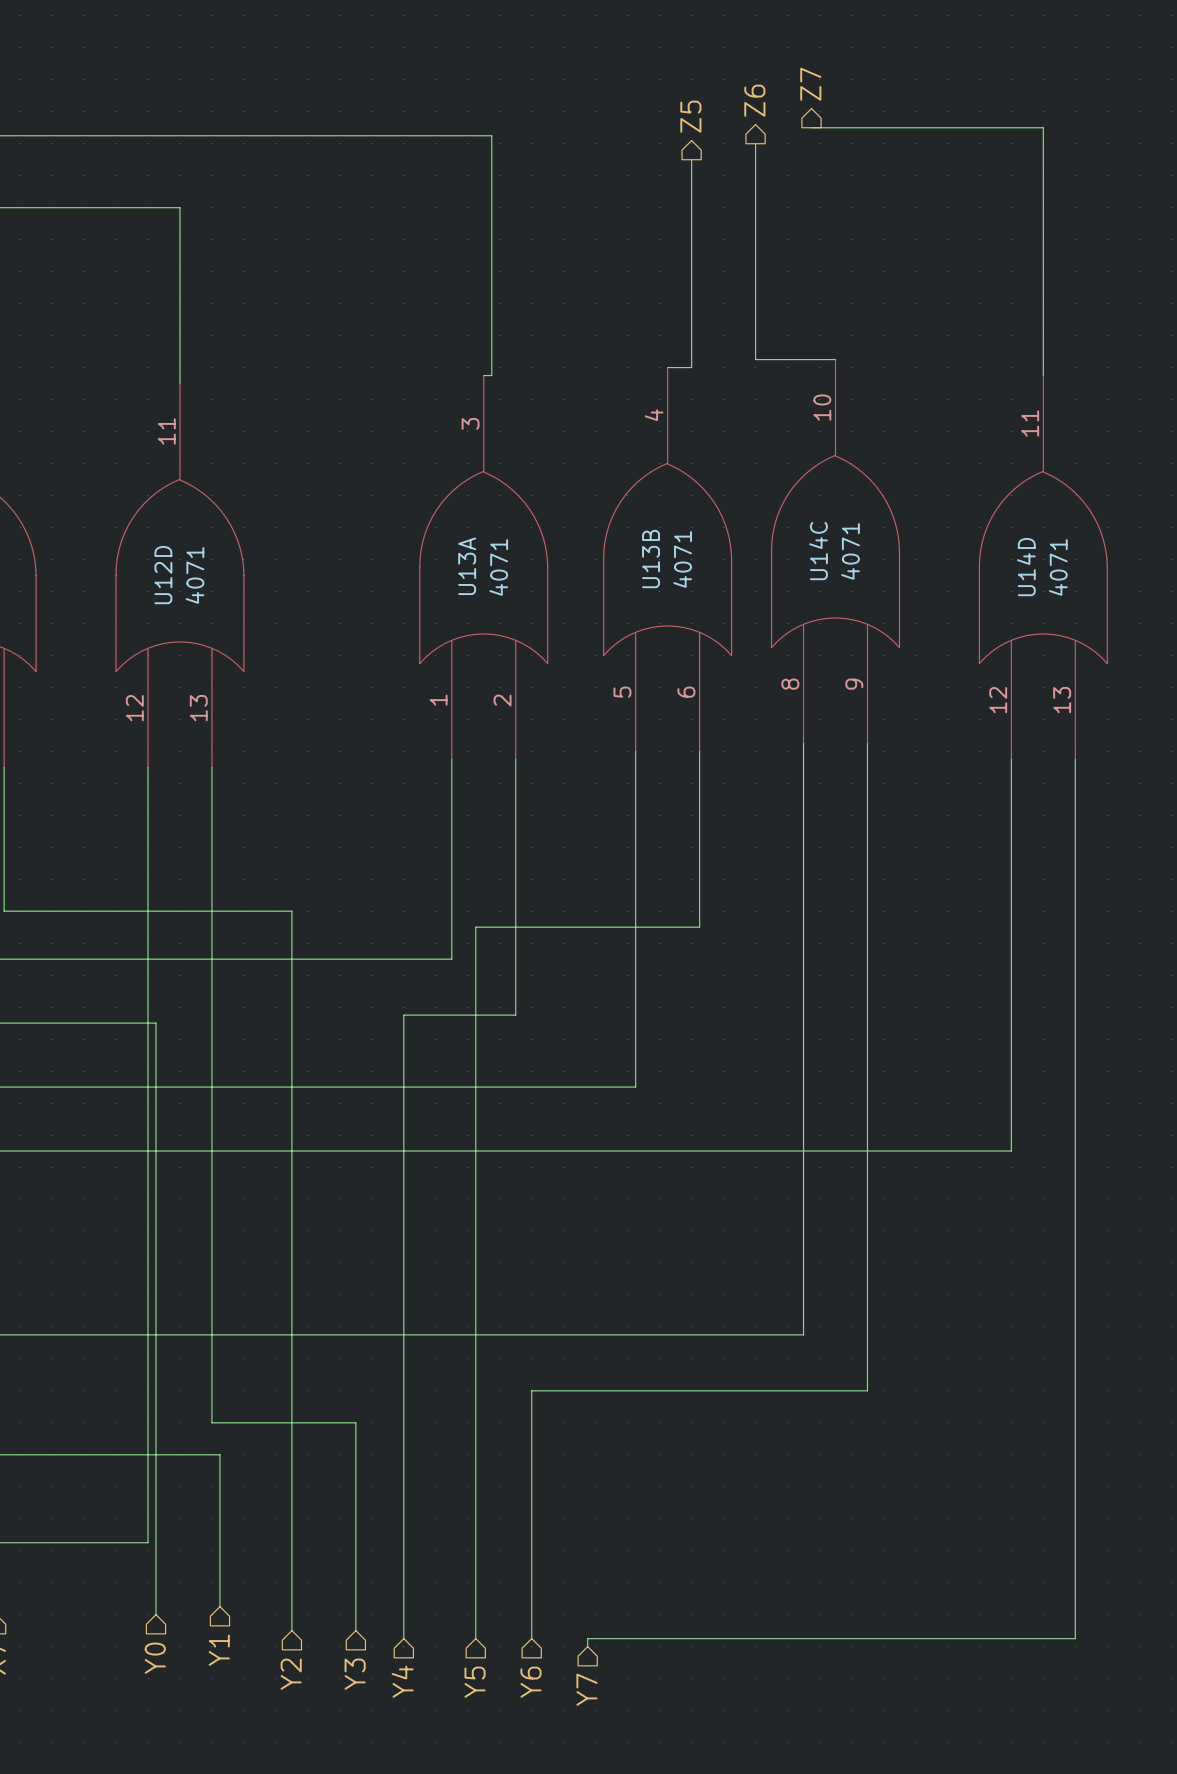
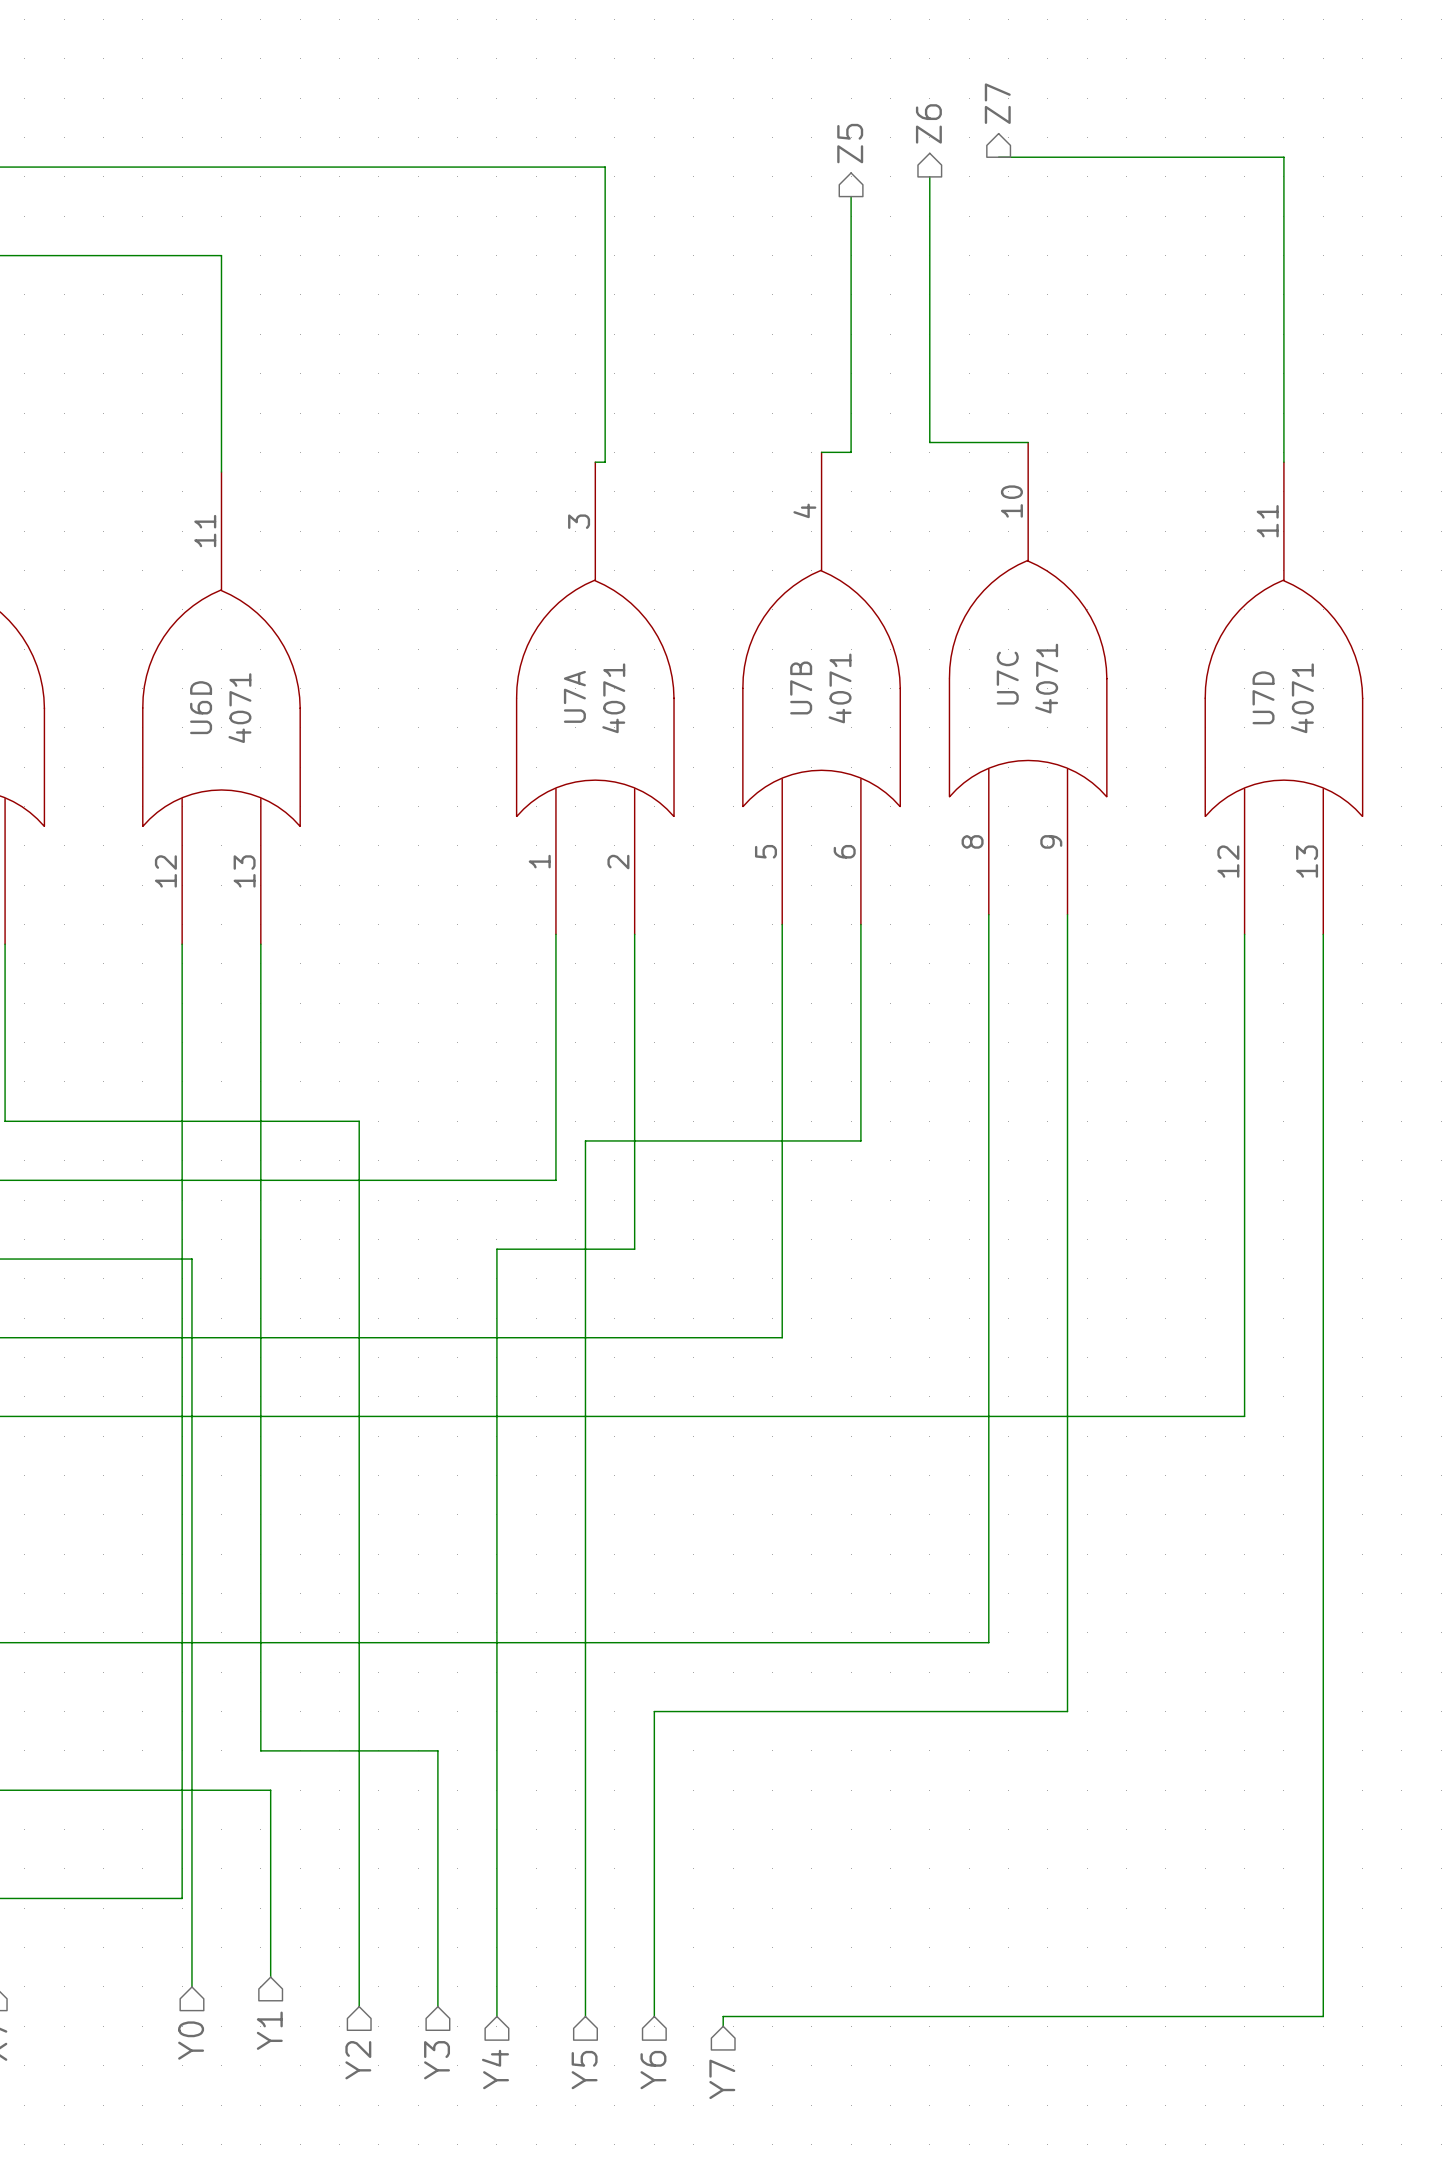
U14C name: U14C (818, 551) -> U7C (1007, 678)
U13B name: U13B (651, 559) -> U7B (801, 687)
U13A name: U13A (467, 566) -> U7A (574, 696)
U14D name: U14D (1026, 567) -> U7D (1263, 697)
U12D name: U12D (163, 575) -> U6D (201, 707)

